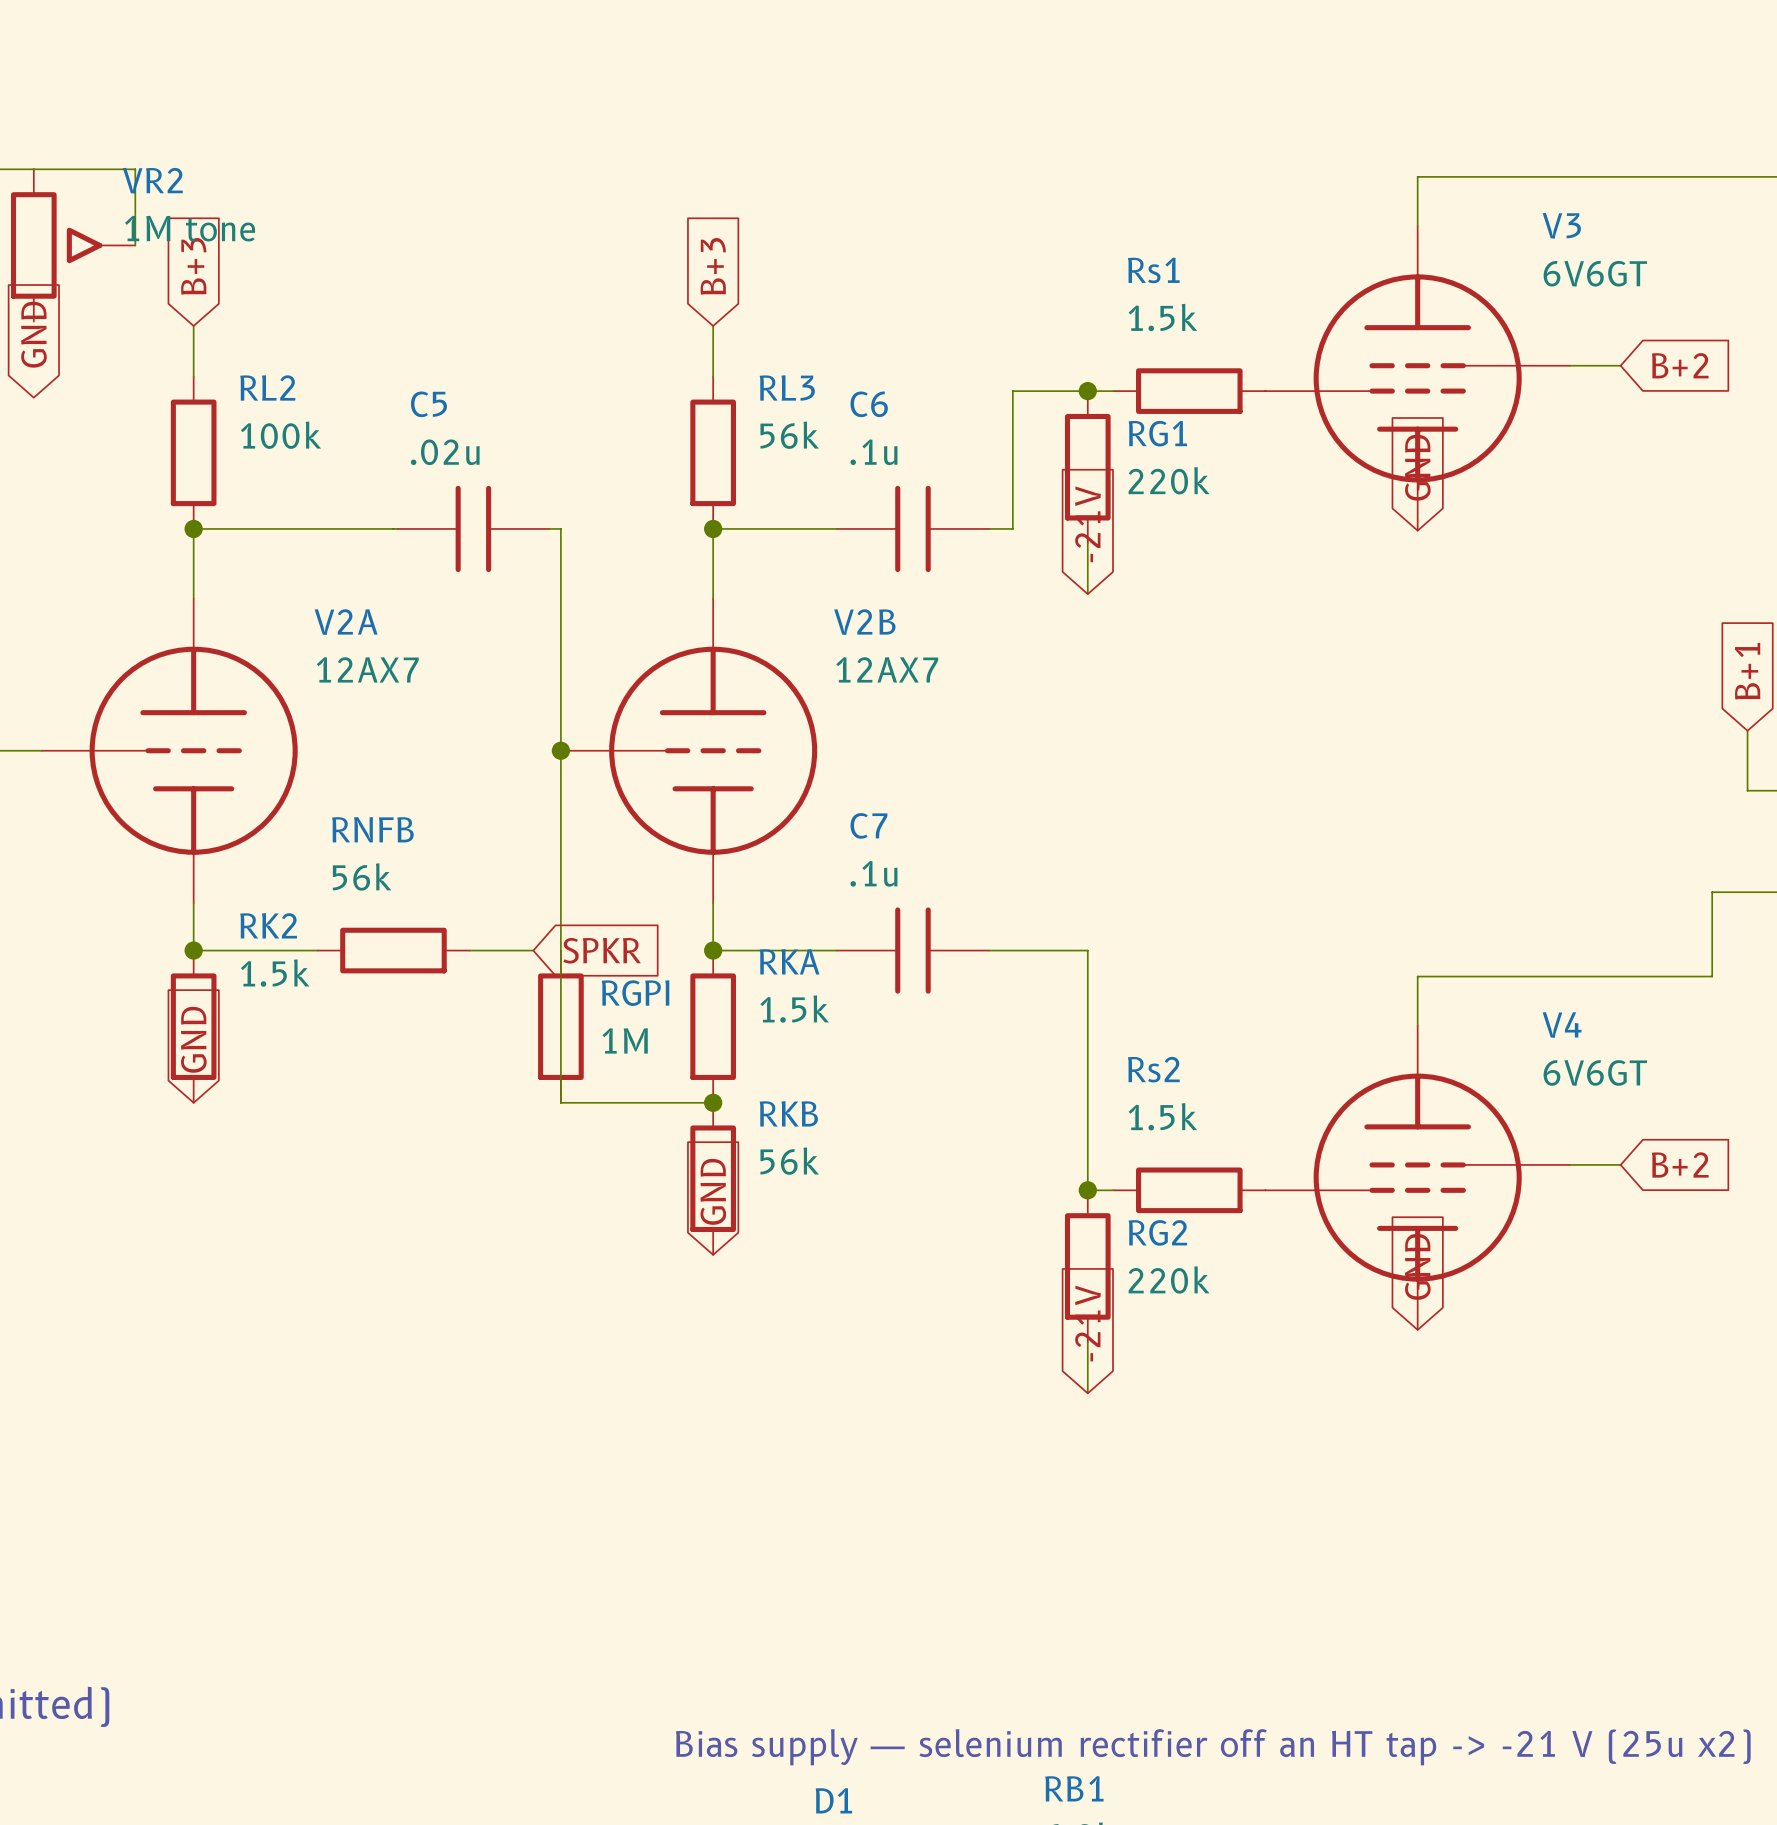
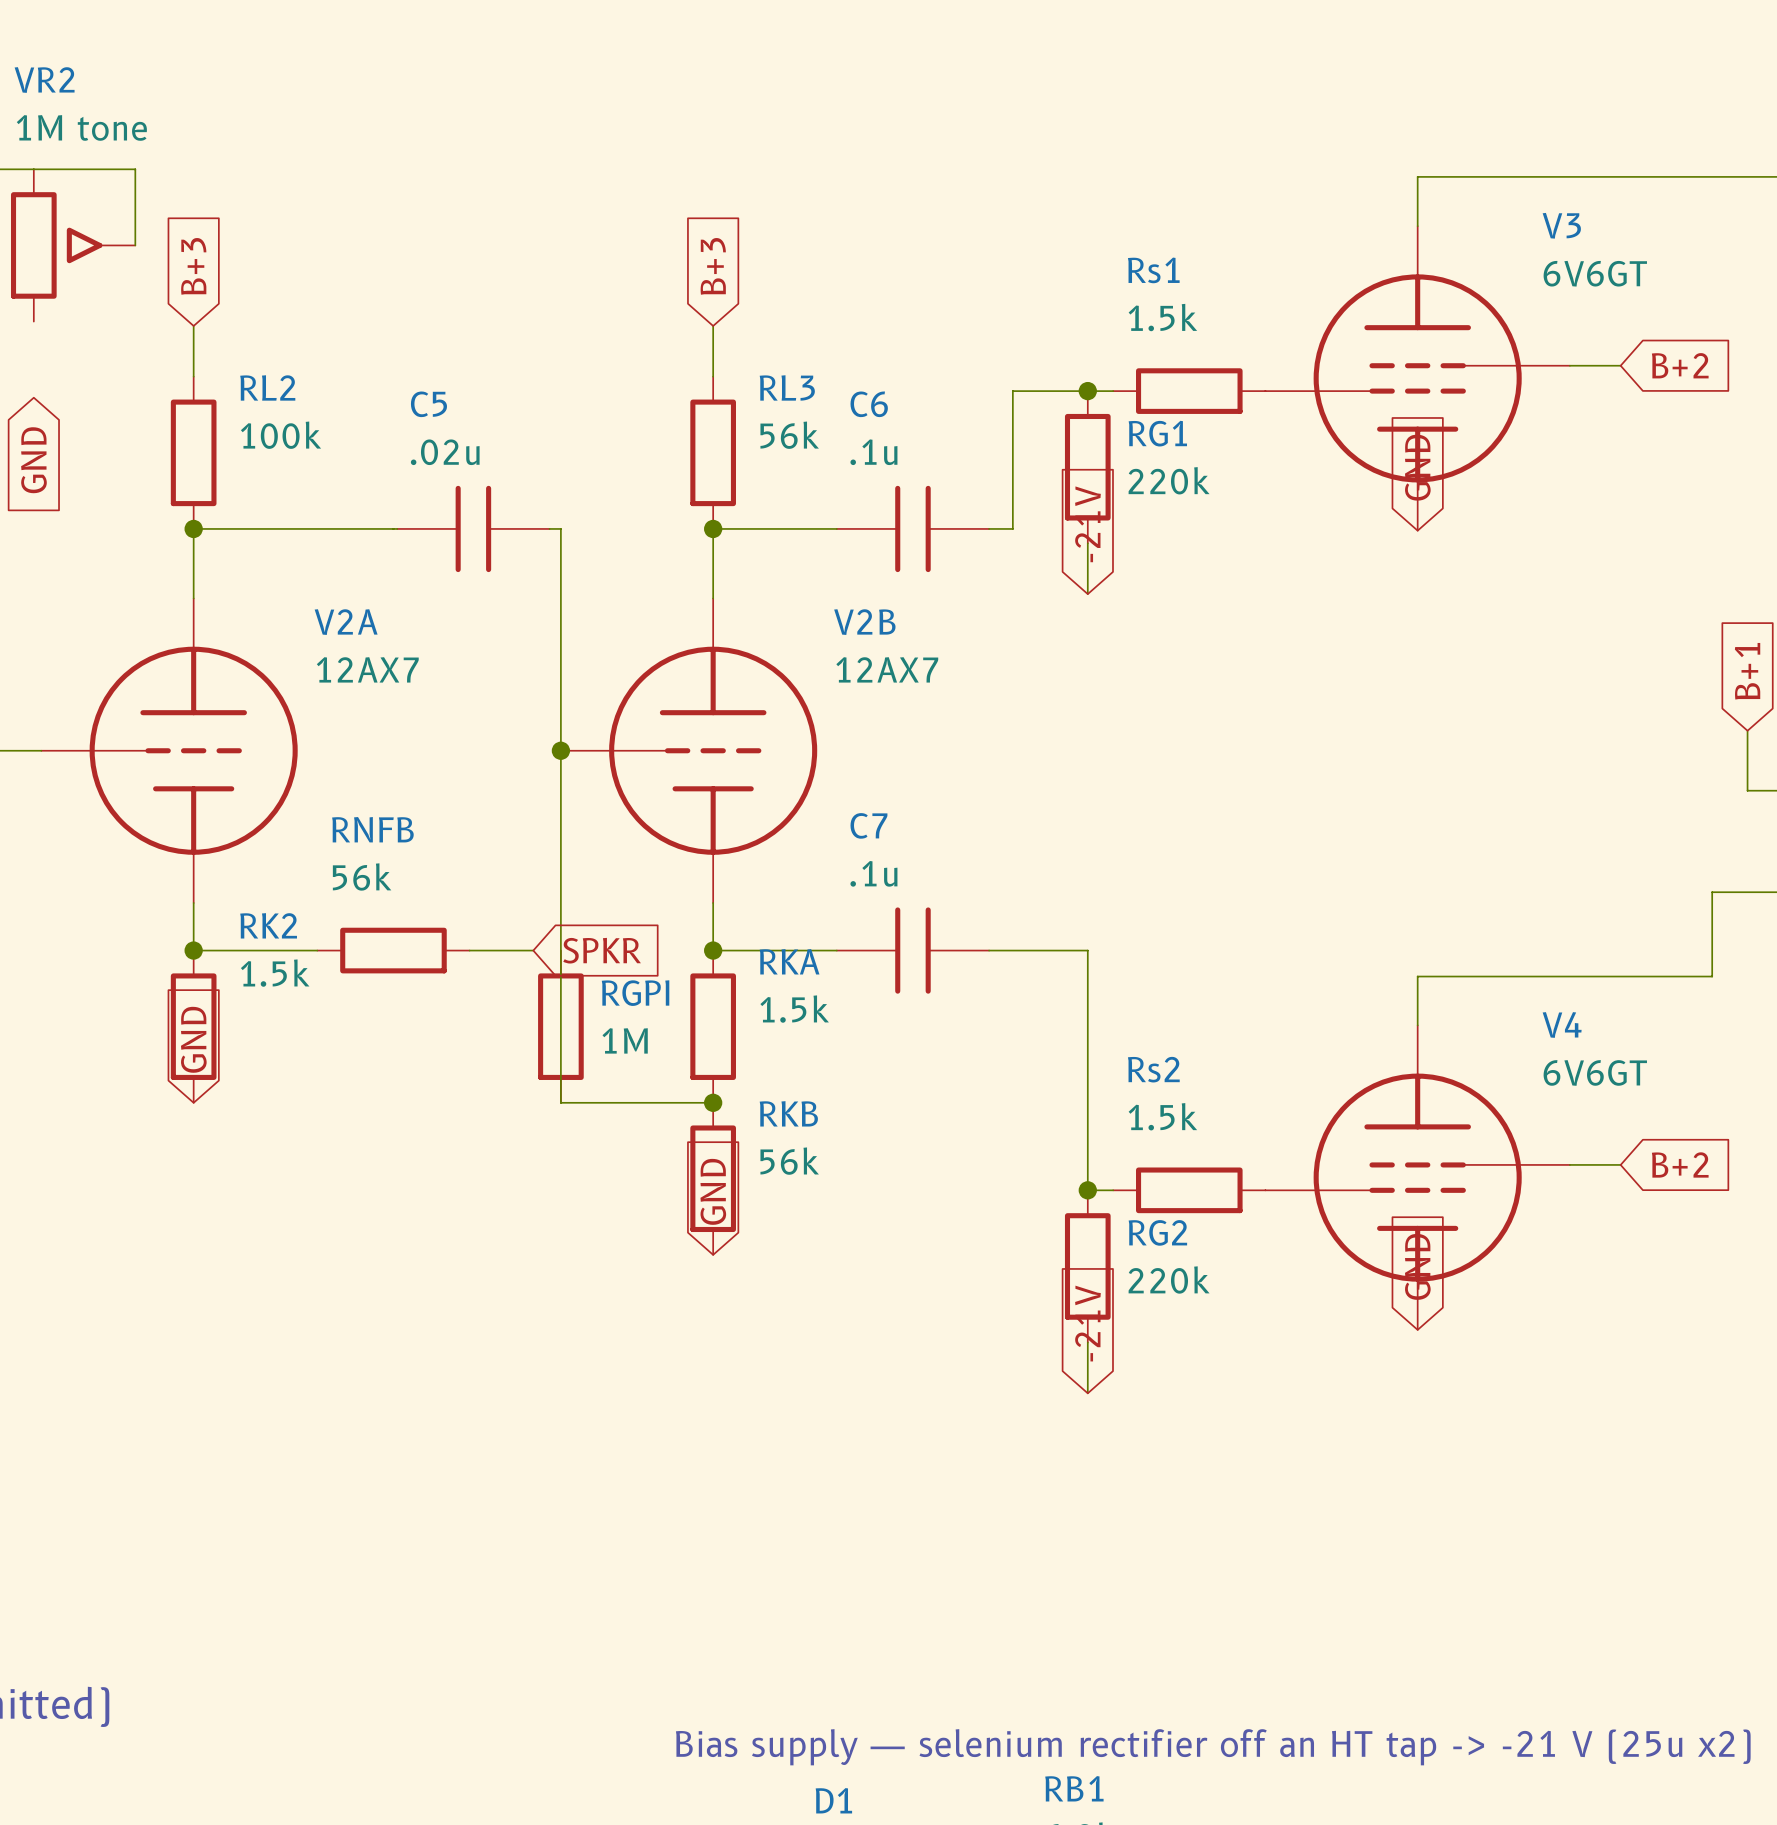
VR2 name position: VR2 (152, 180) -> VR2 (44, 80)
VR2 value position: 1M tone (190, 228) -> 1M tone (81, 127)
global label rotation: 0° (33, 334) -> 180° (33, 460)

